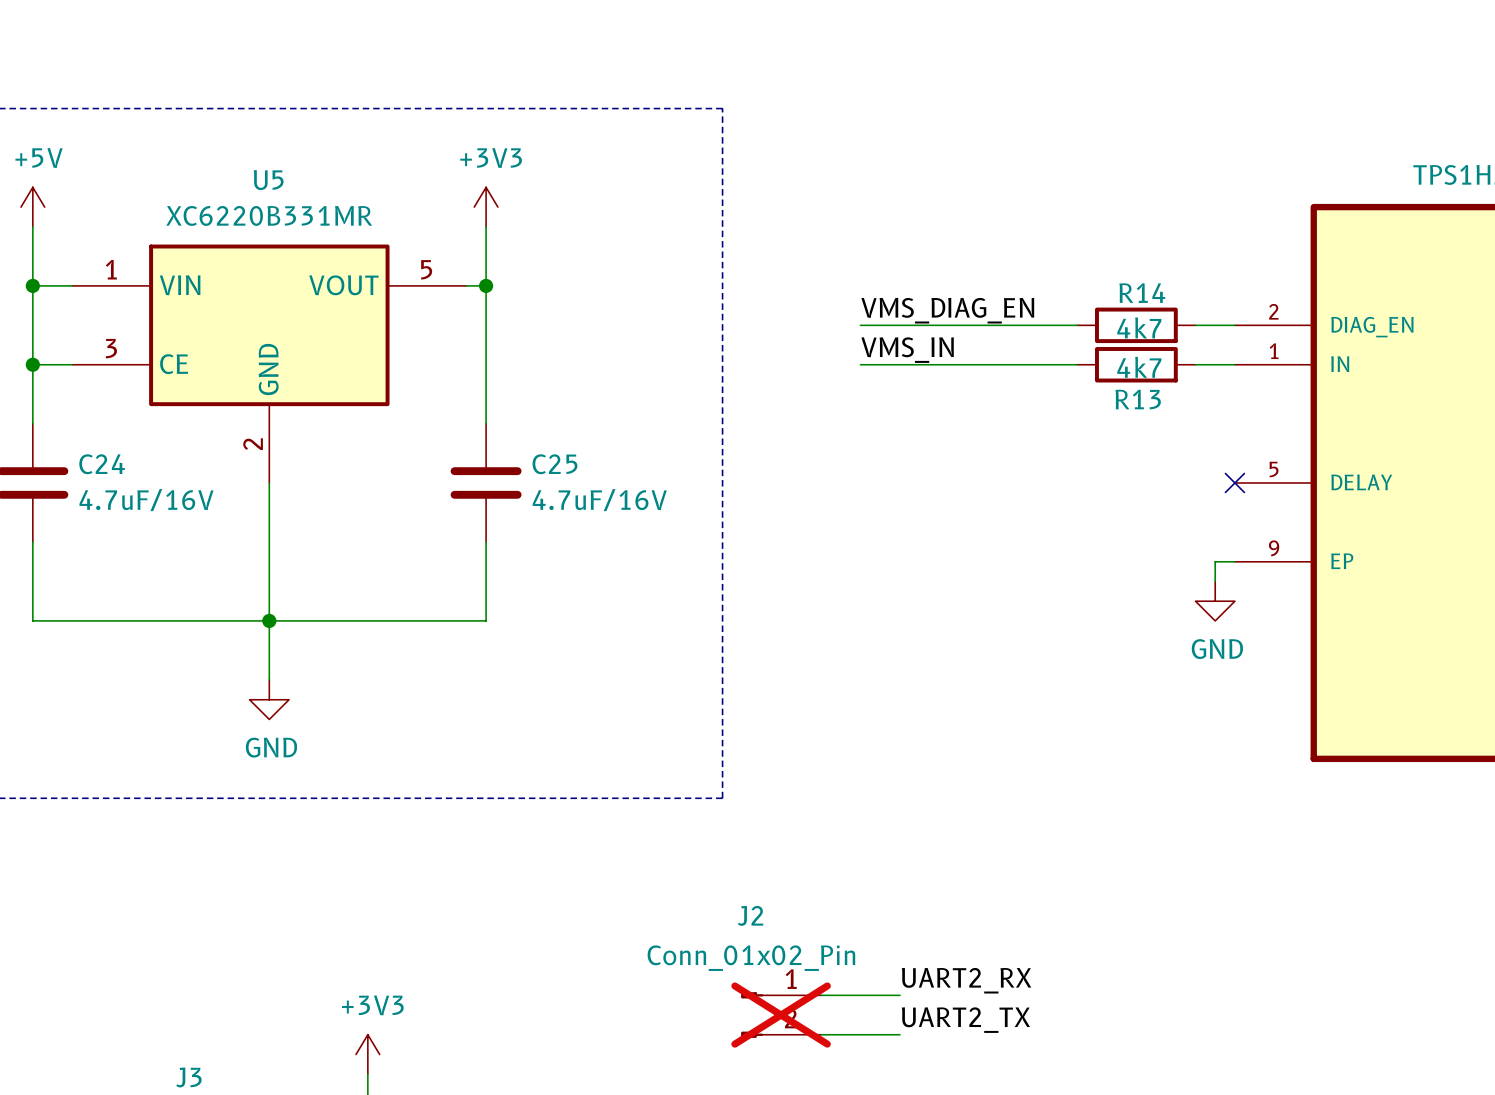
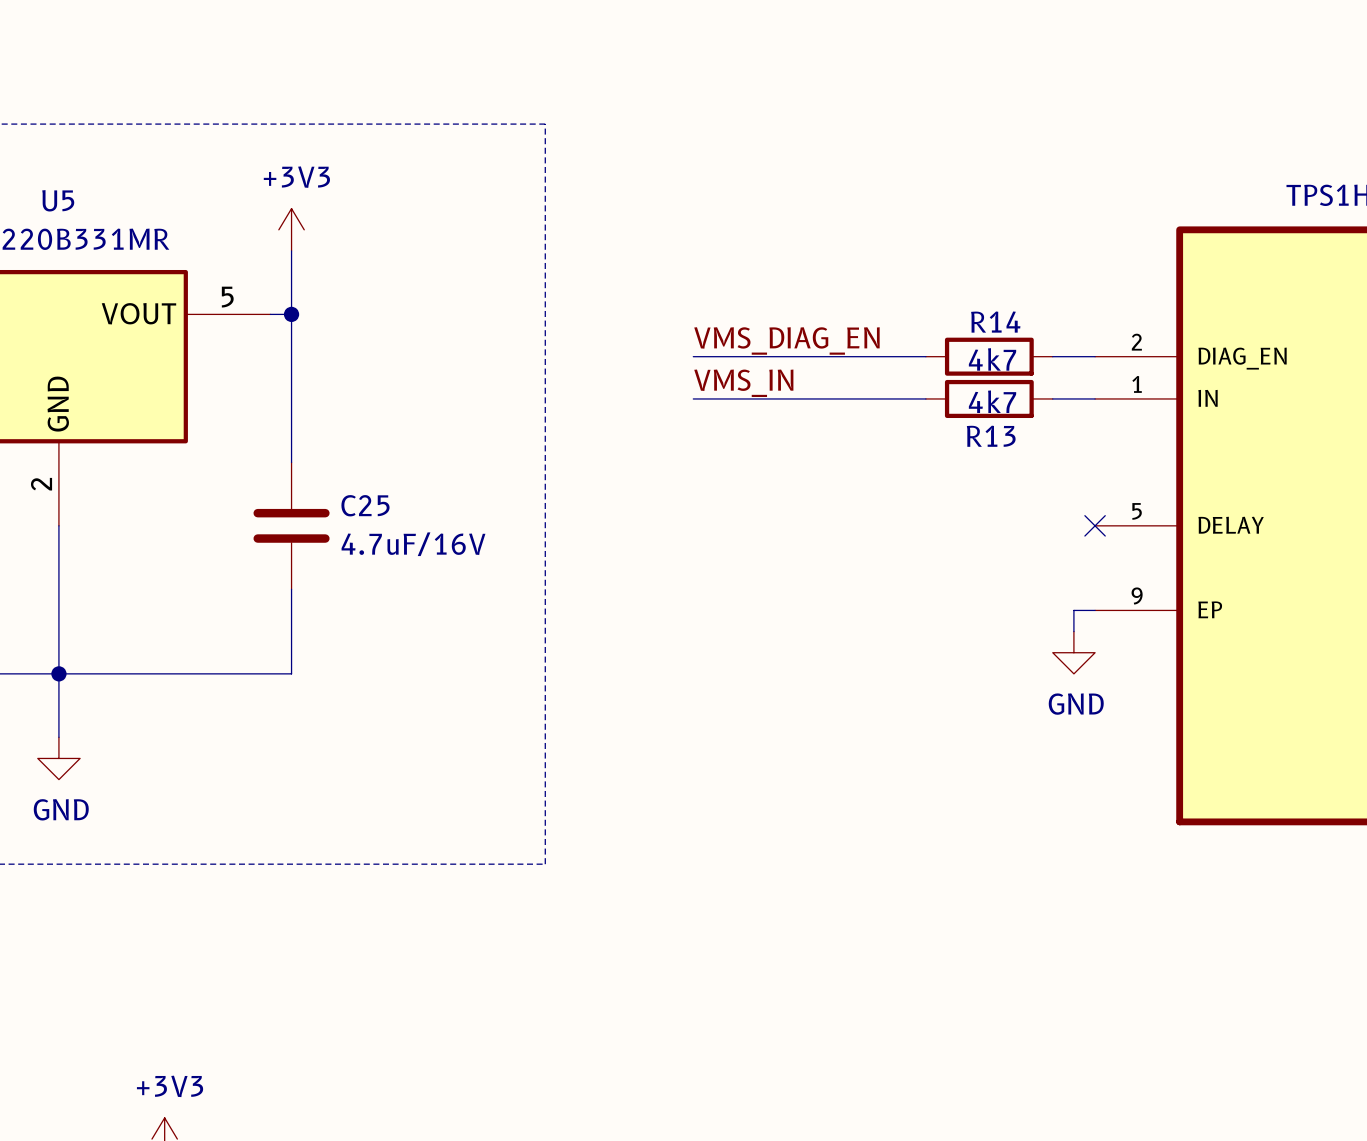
label: UART2_RX (966, 980) -> none
wire: (821, 995) (899, 995) -> none
J2: Conn_01x02_Pin (781, 1015) -> none
label: UART2_TX (965, 1020) -> none
wire: (821, 1034) (899, 1034) -> none

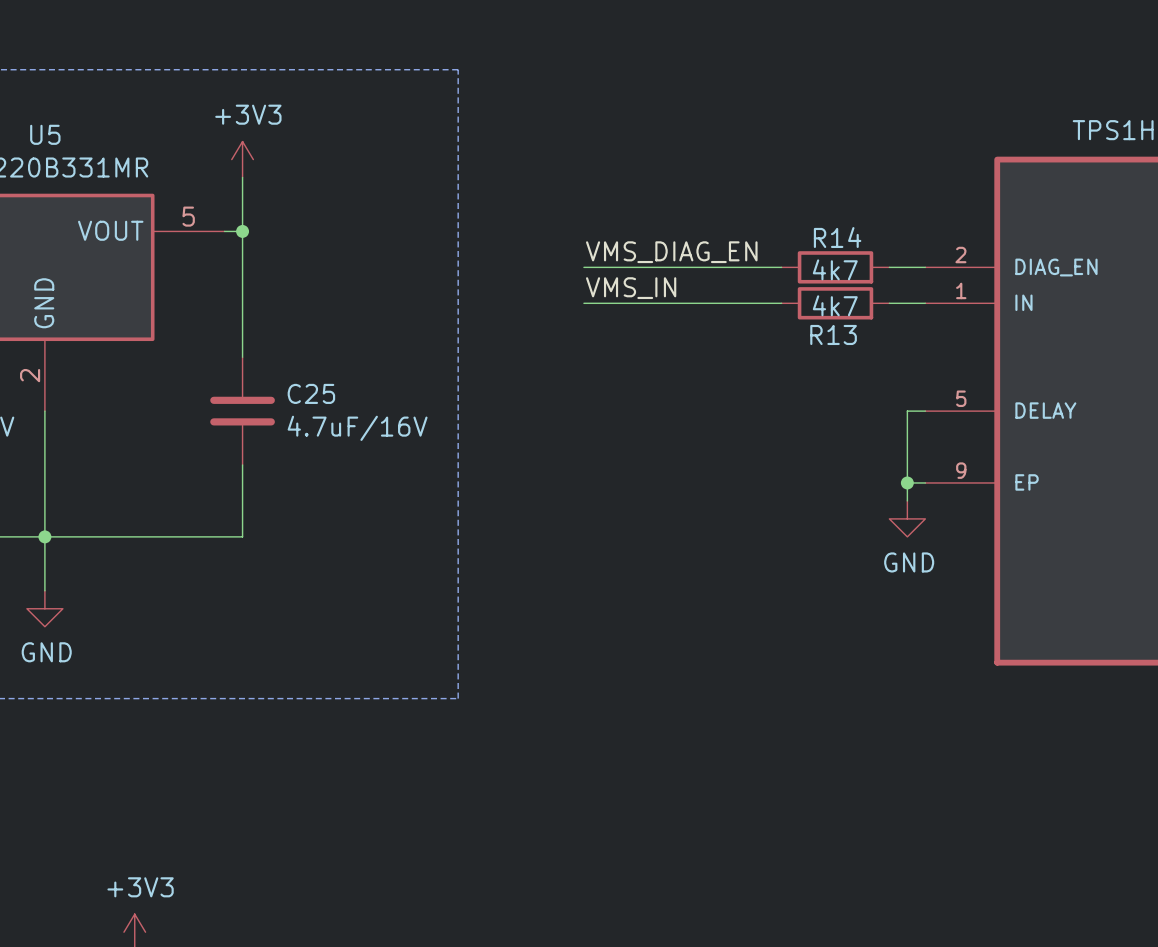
wire: none -> (925, 411) (907, 411) (907, 482)
no-connect mark: (1095, 525) -> none
junction: none -> (907, 482)

